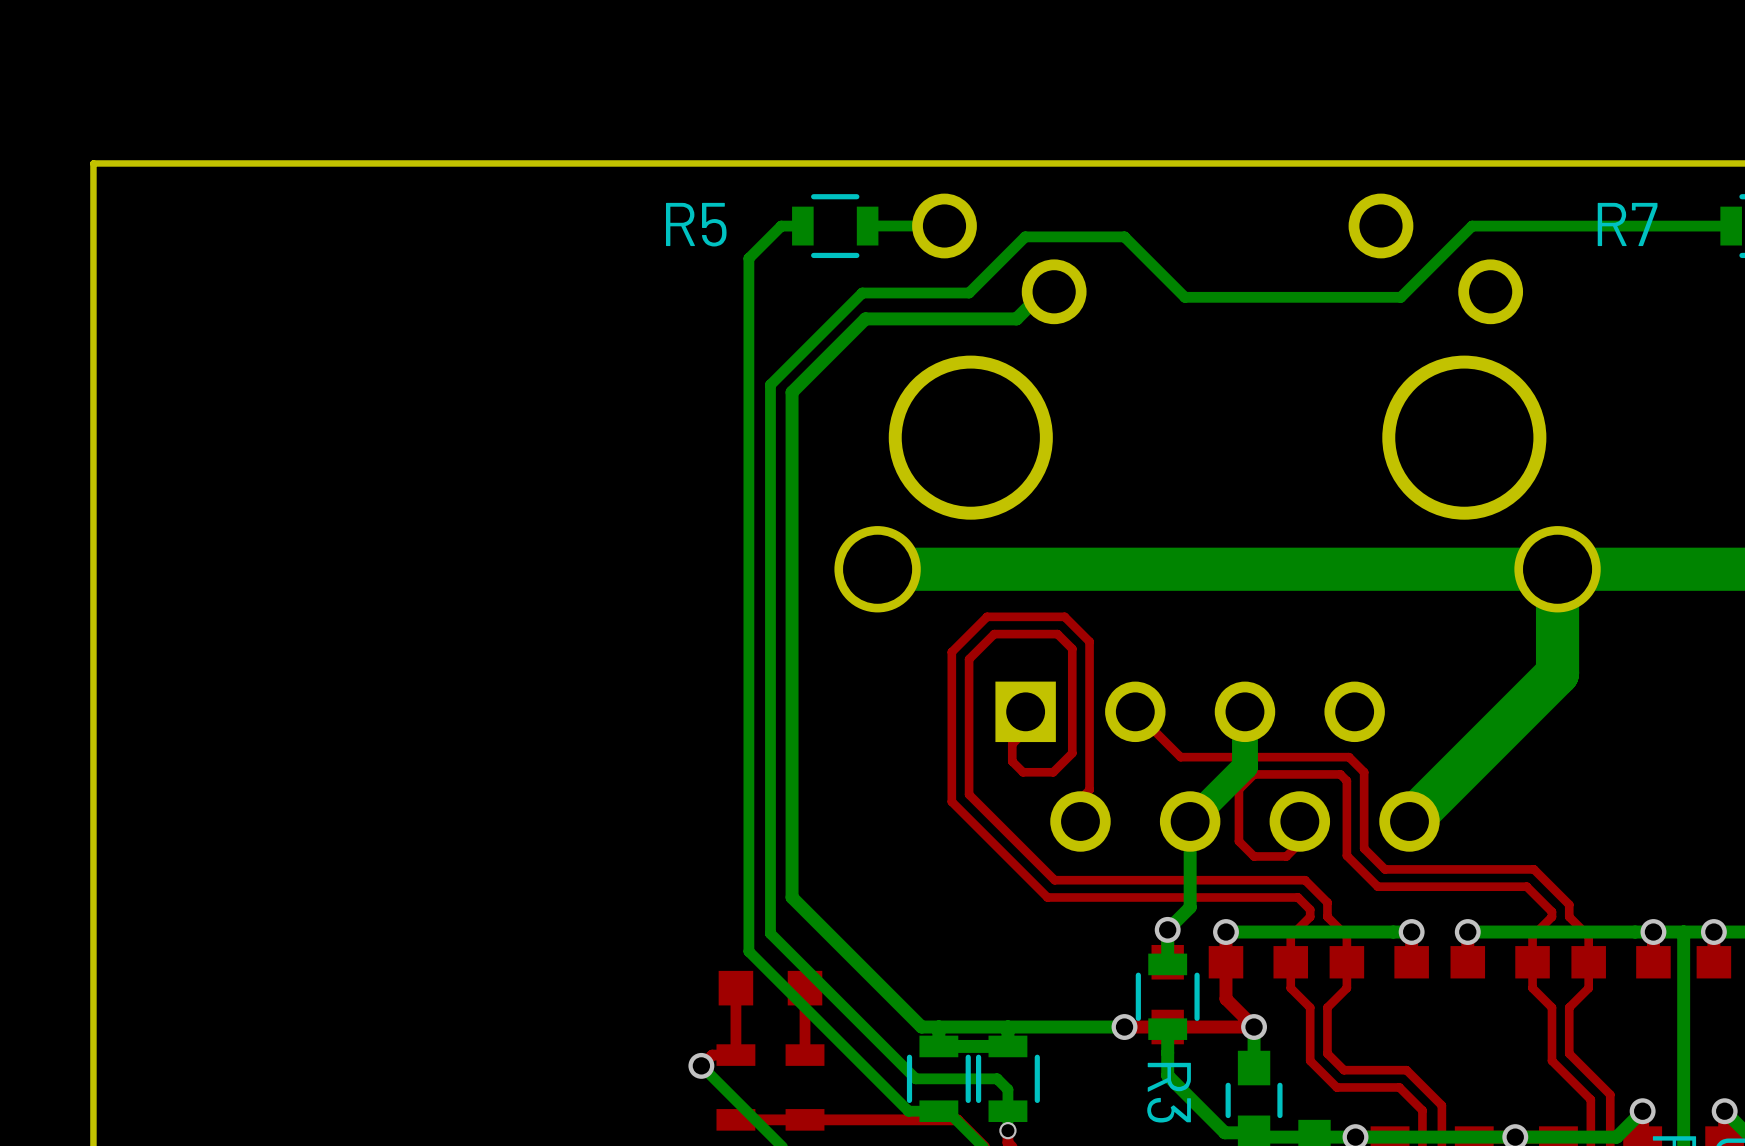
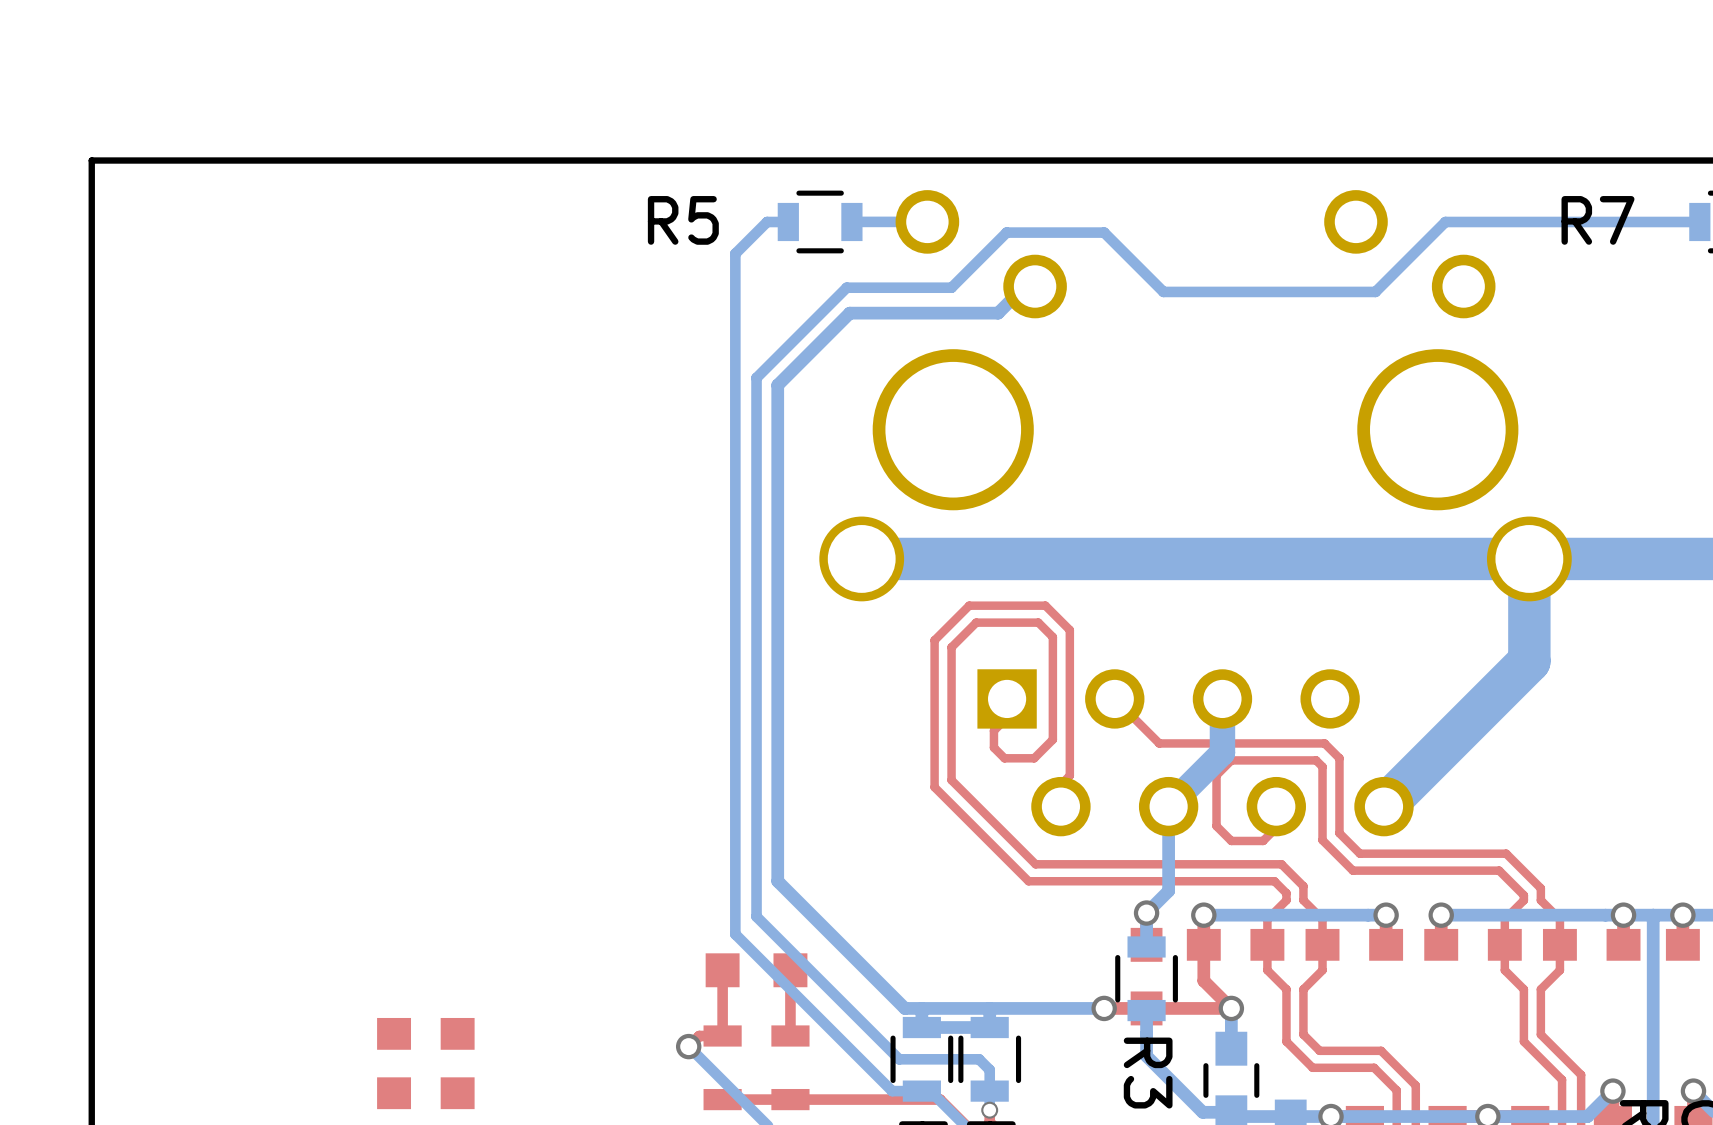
part: none -> (425, 1033)
part: none -> (425, 1093)

